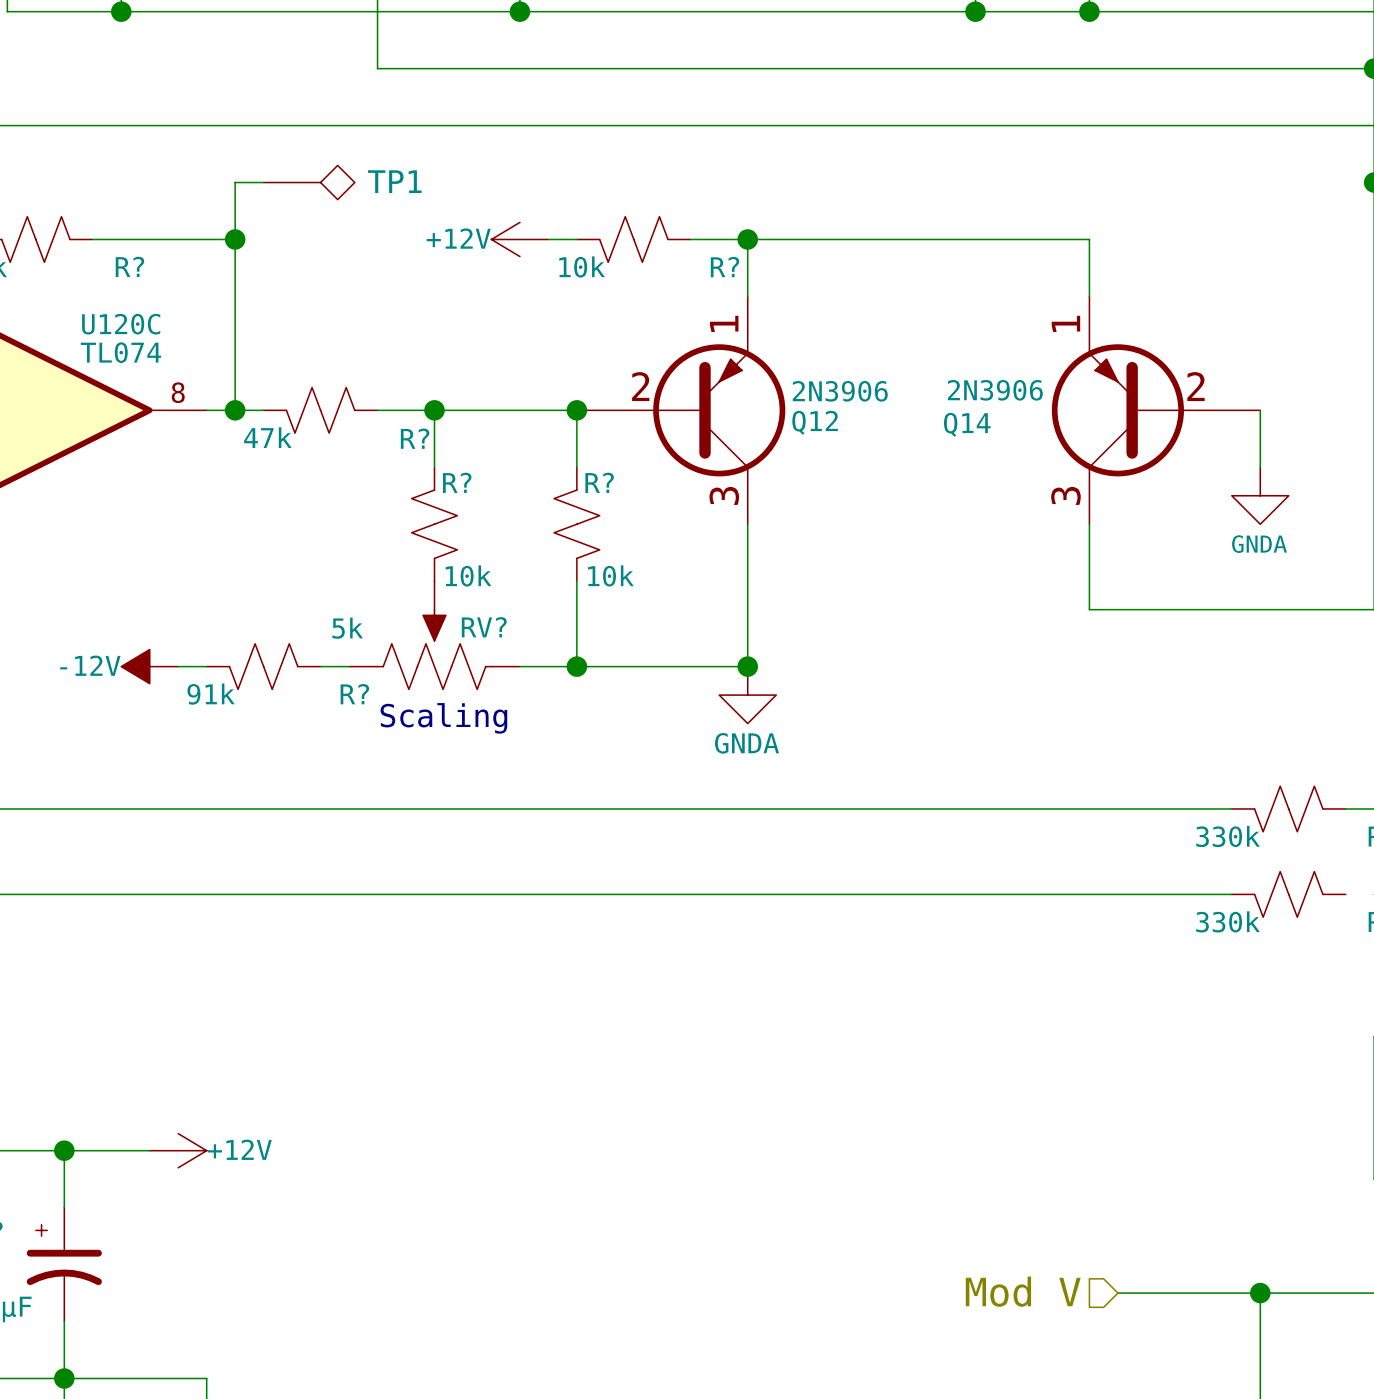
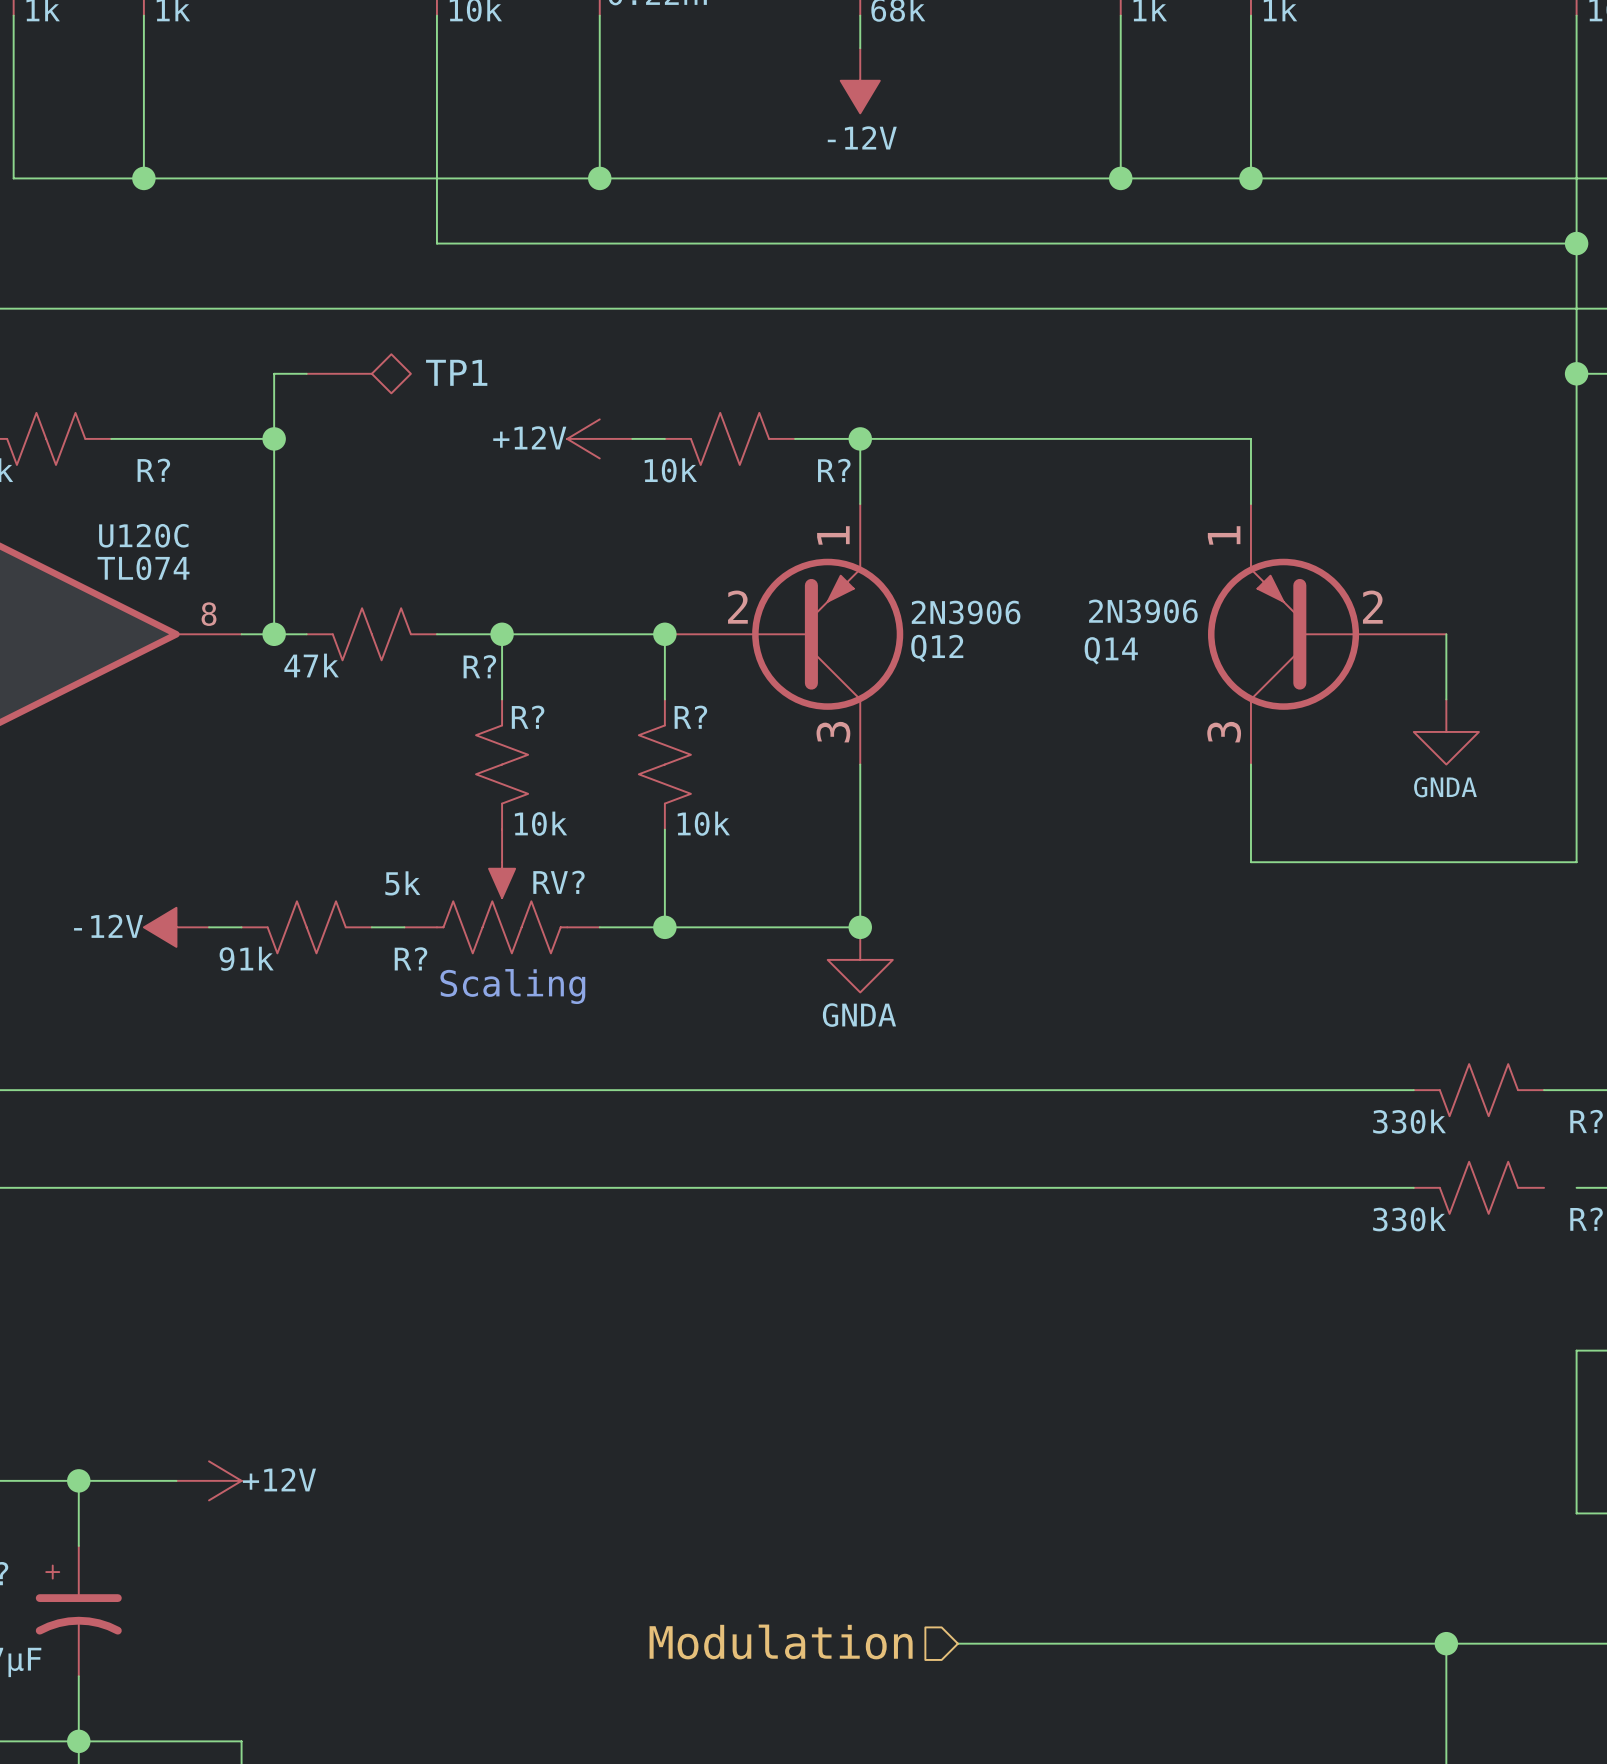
hierarchical label: none -> Modulation (781, 1641)
hierarchical label: Mod V (1023, 1291) -> none
wire: none -> (957, 1643) (1283, 1643)

